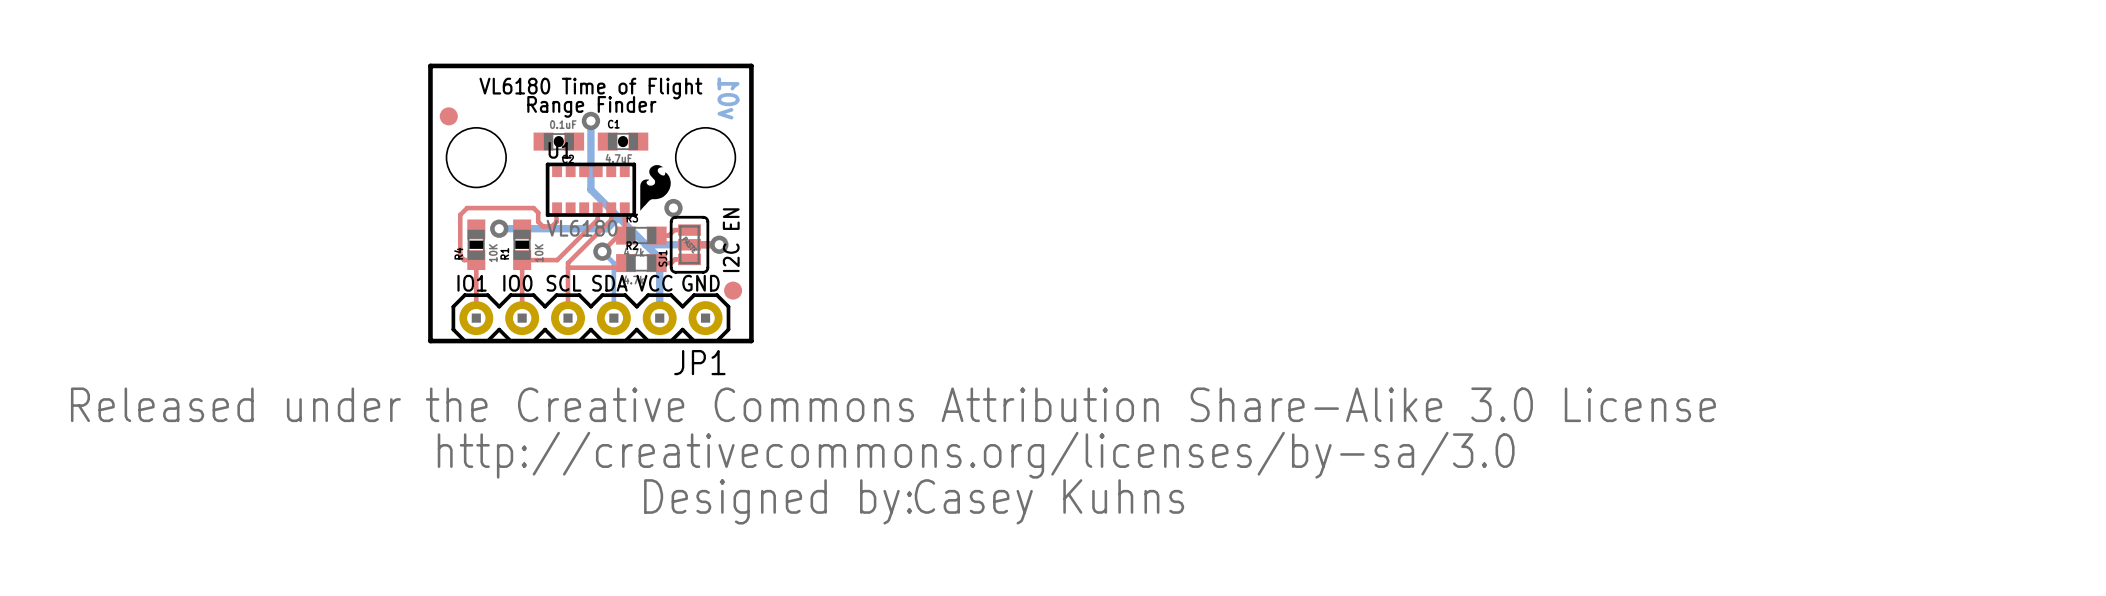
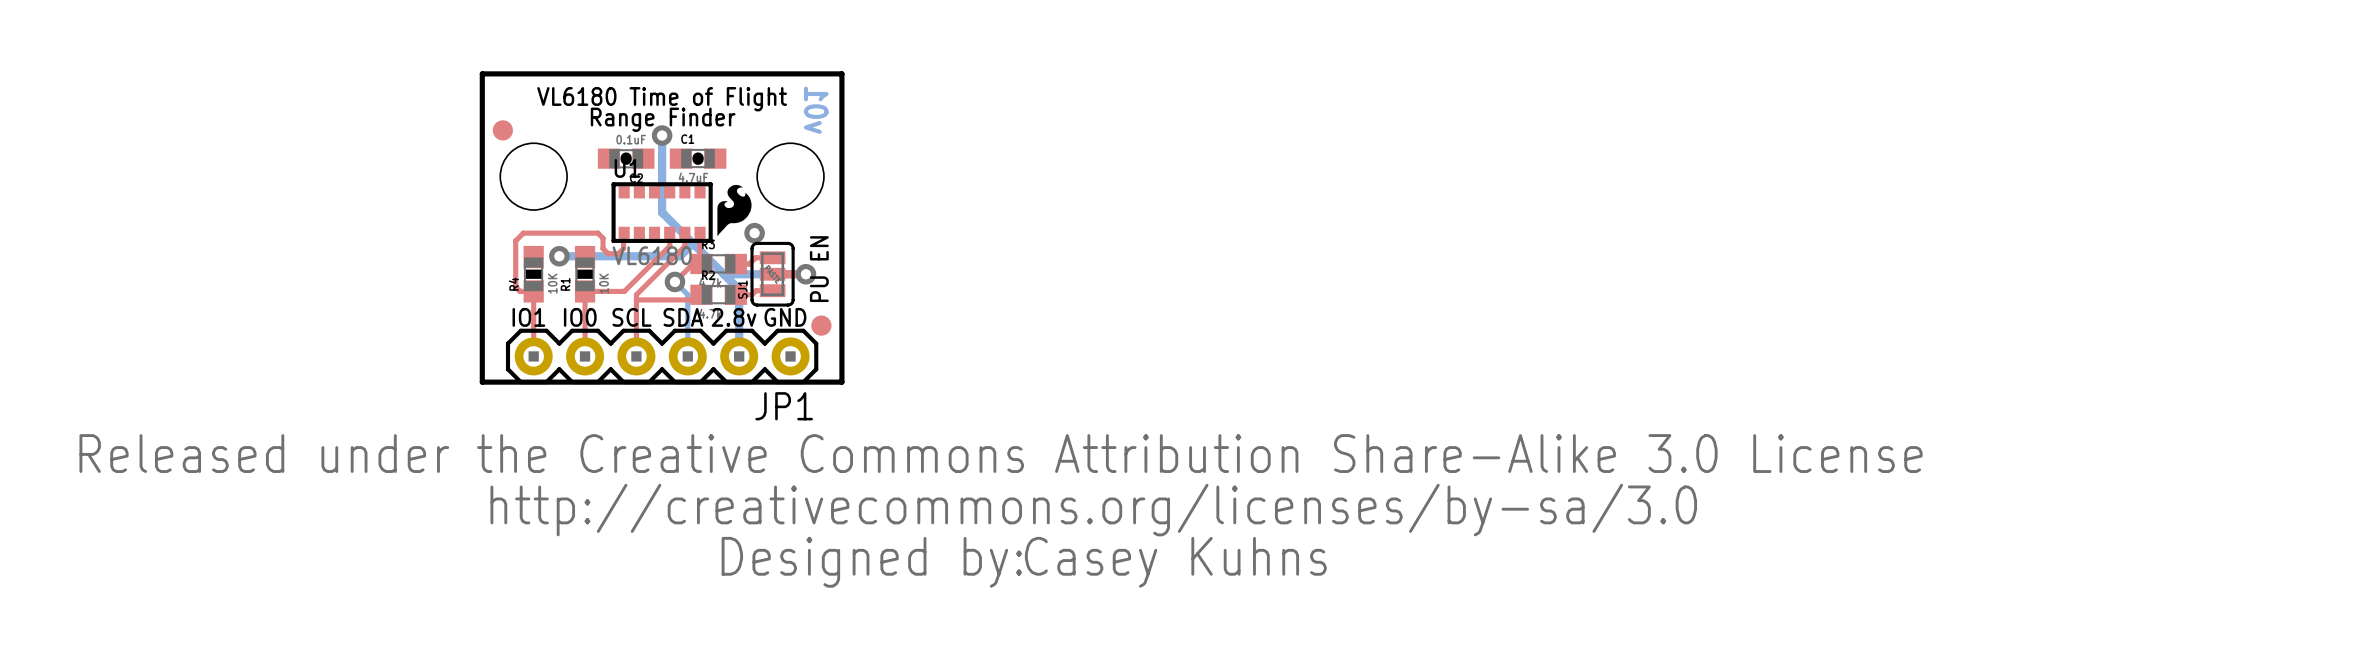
text: I2C EN (731, 240) -> PU EN (819, 269)
text: VCC (654, 283) -> 2.8v (734, 317)

